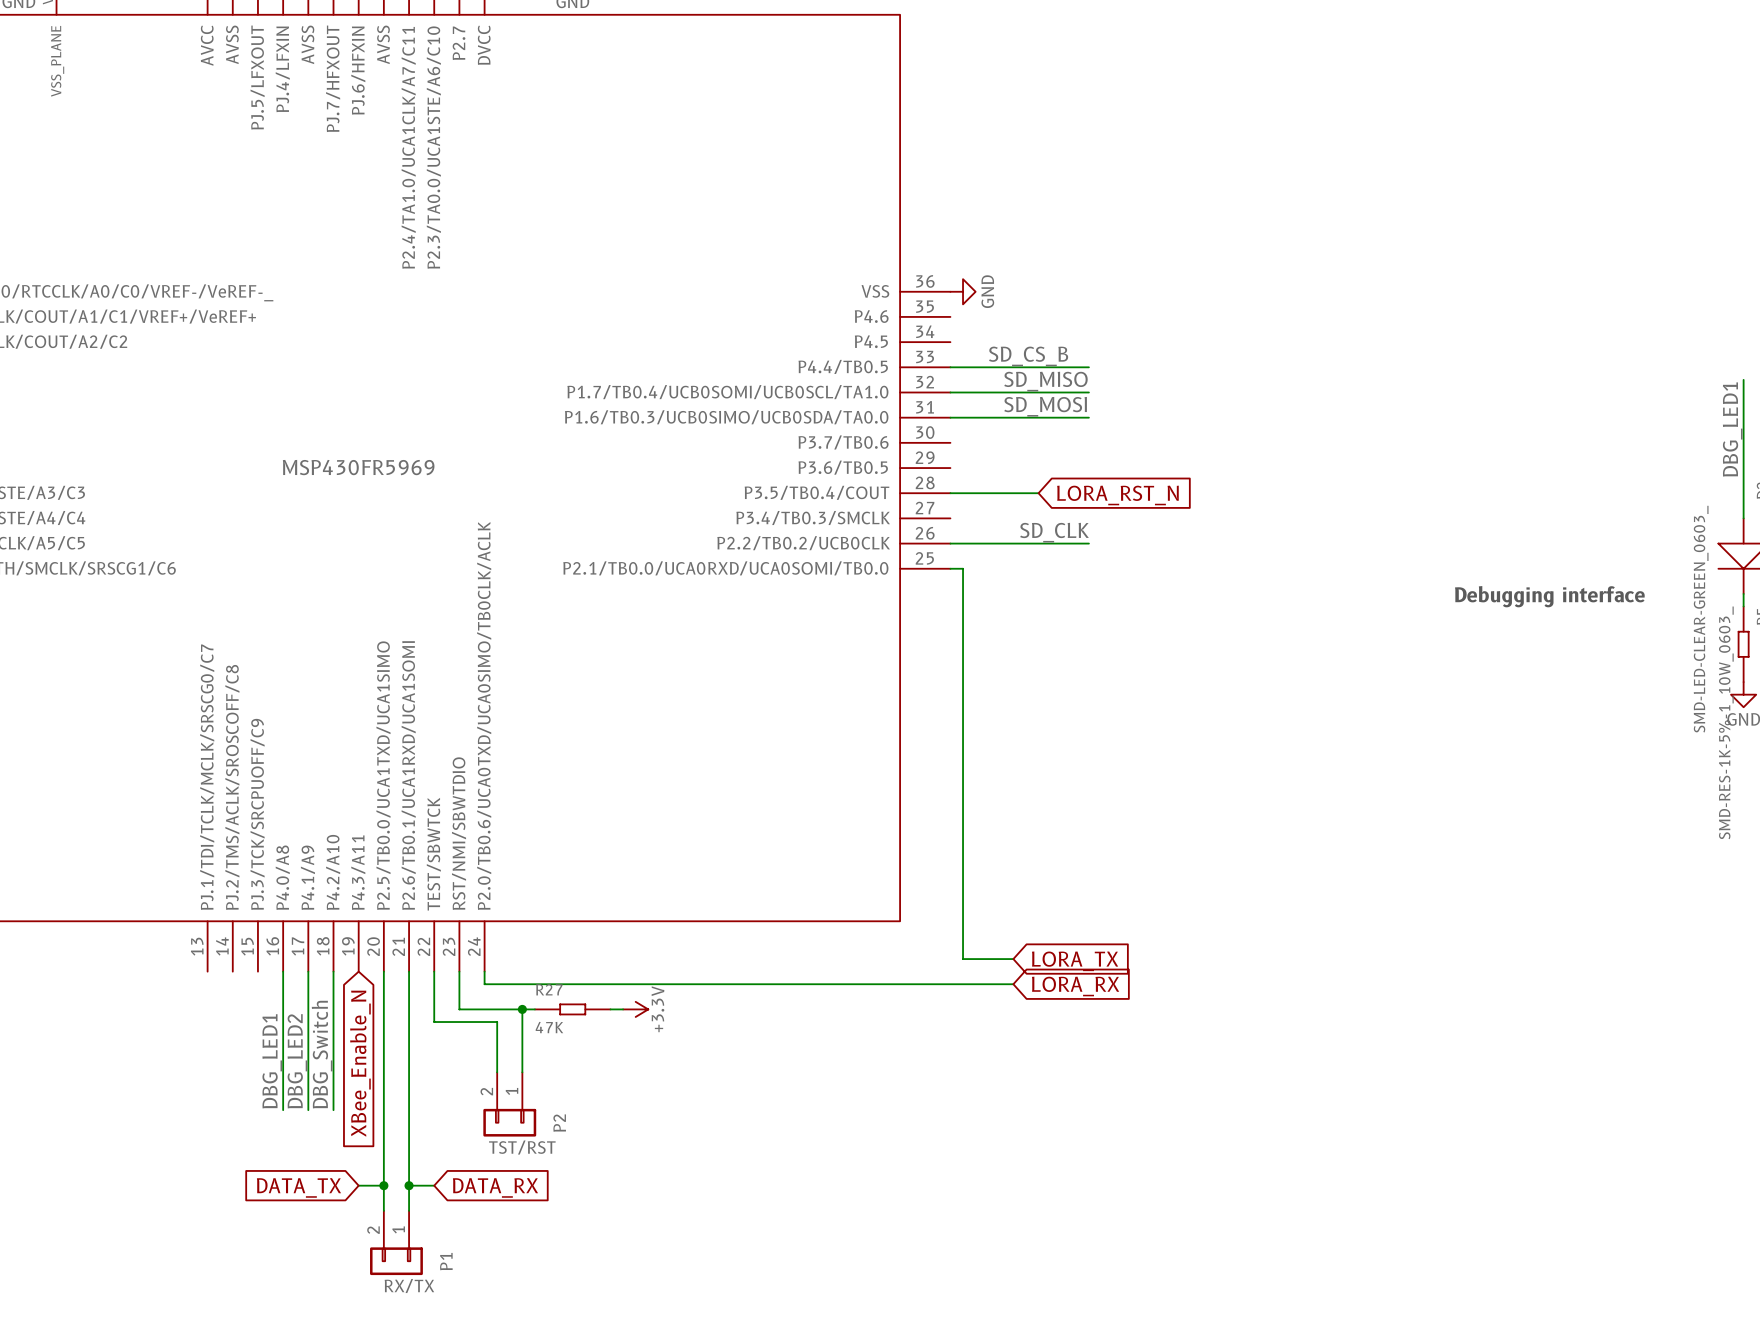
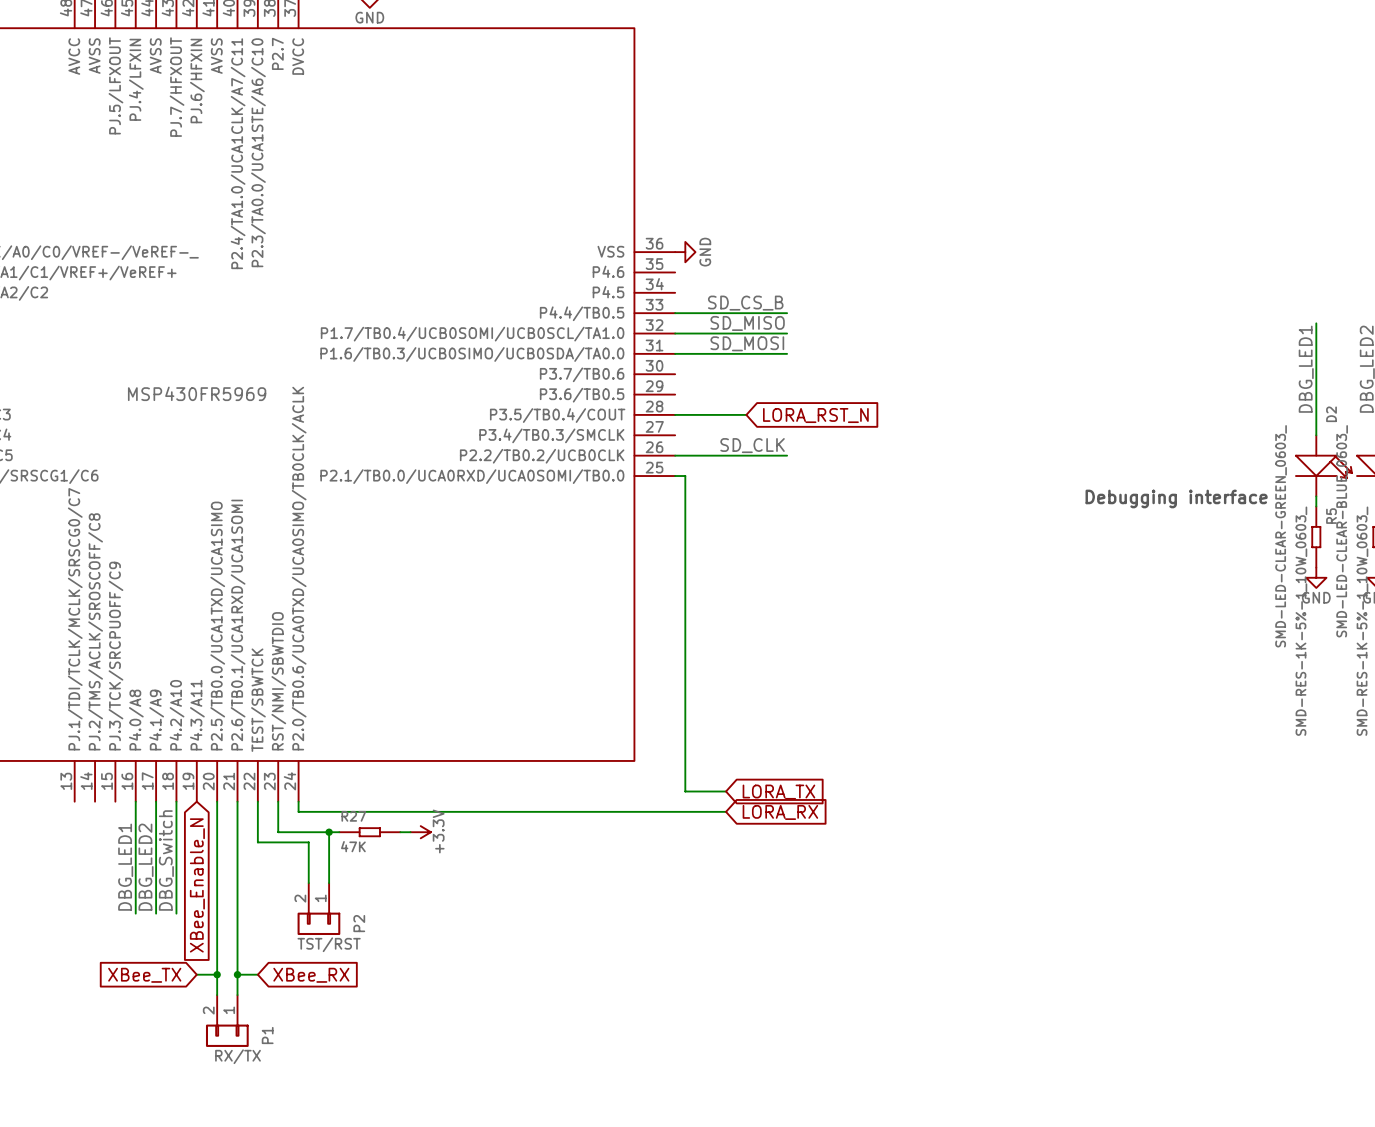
global label: DATA_TX (298, 1187) -> XBee_TX (144, 975)
global label: DATA_RX (495, 1187) -> XBee_RX (311, 975)

